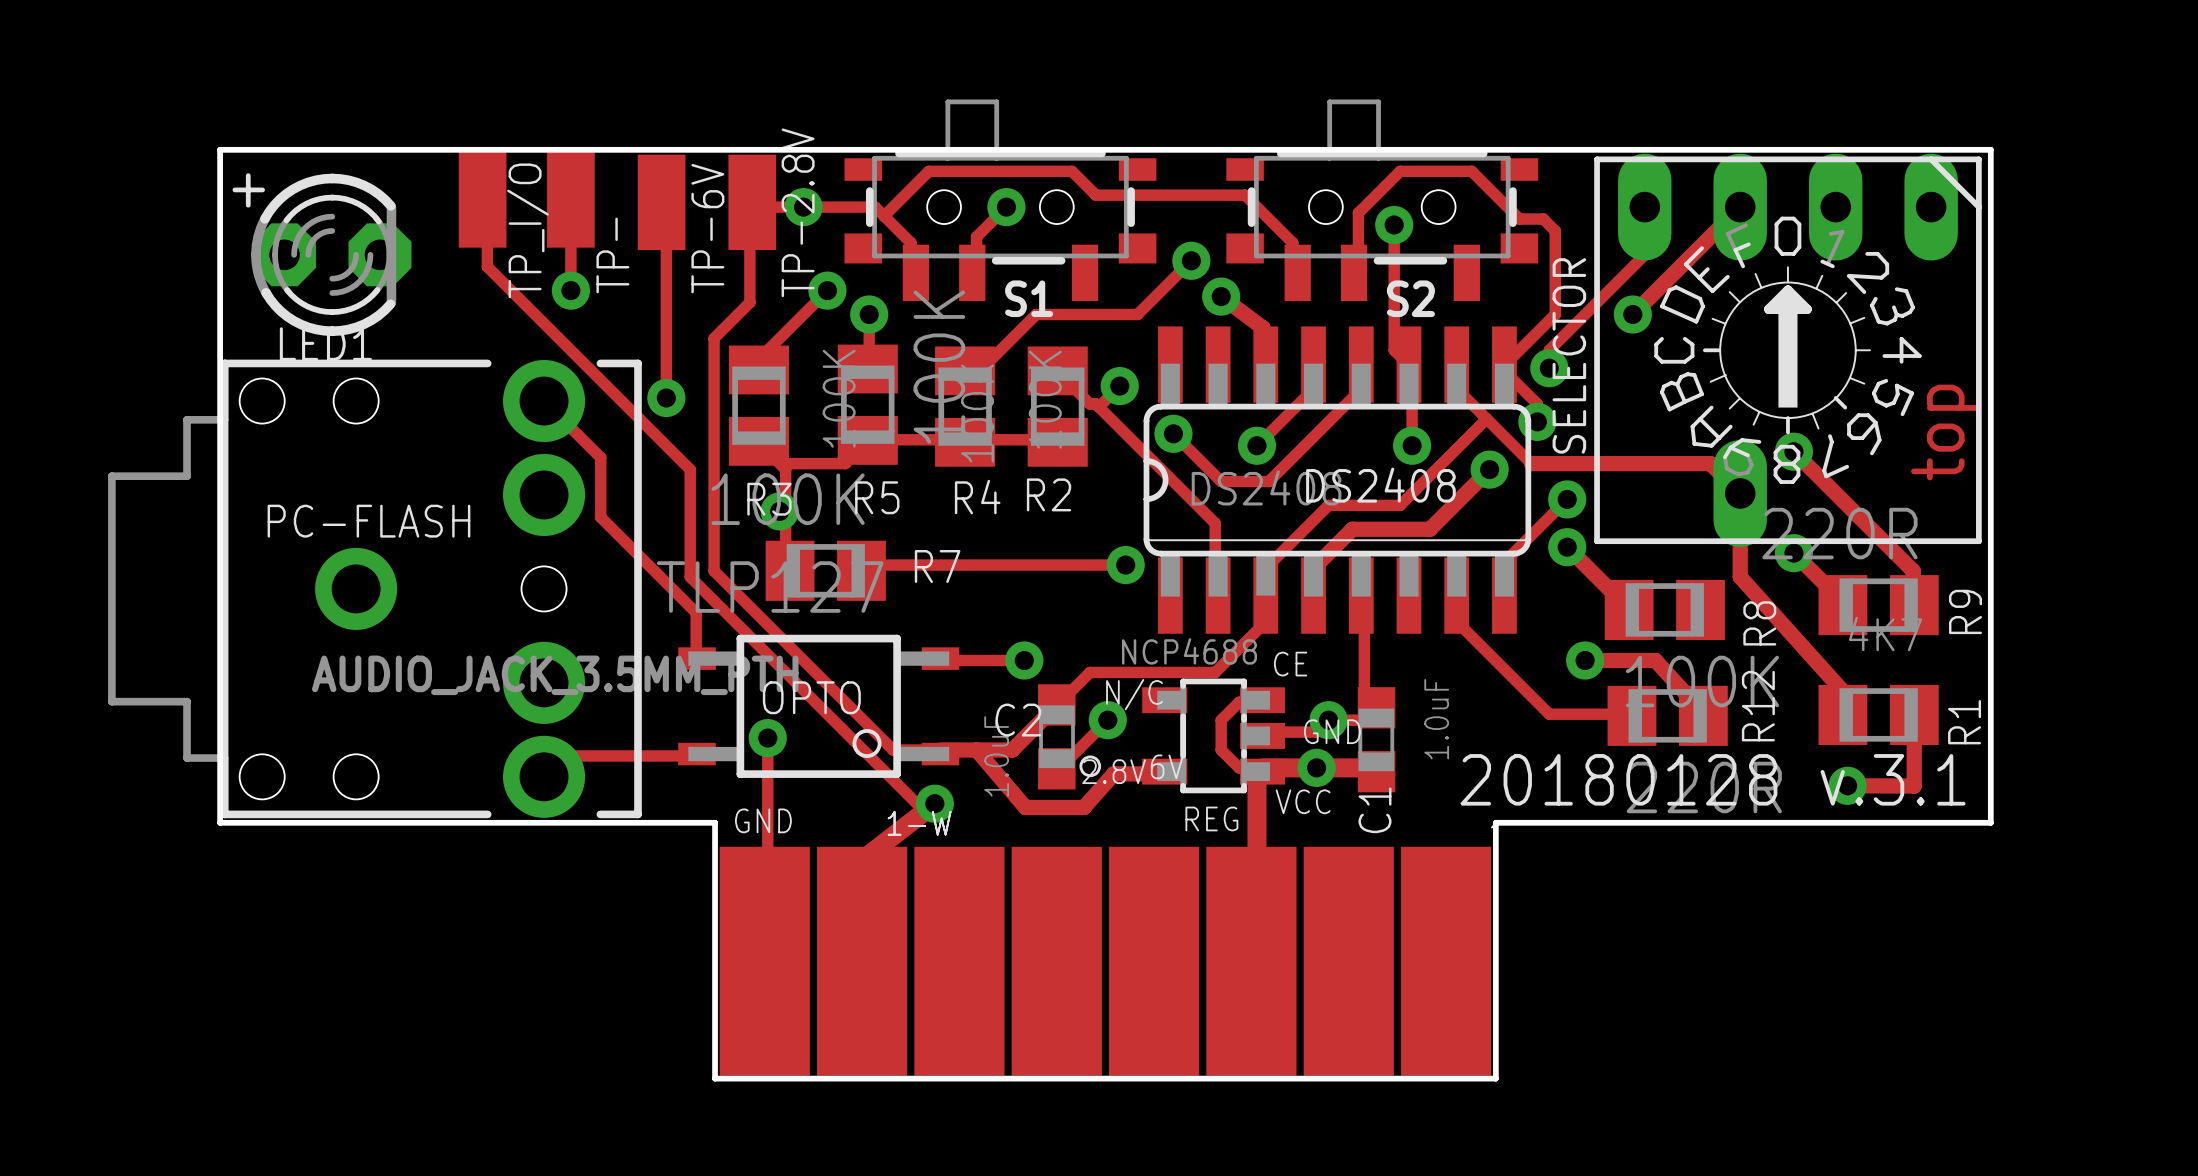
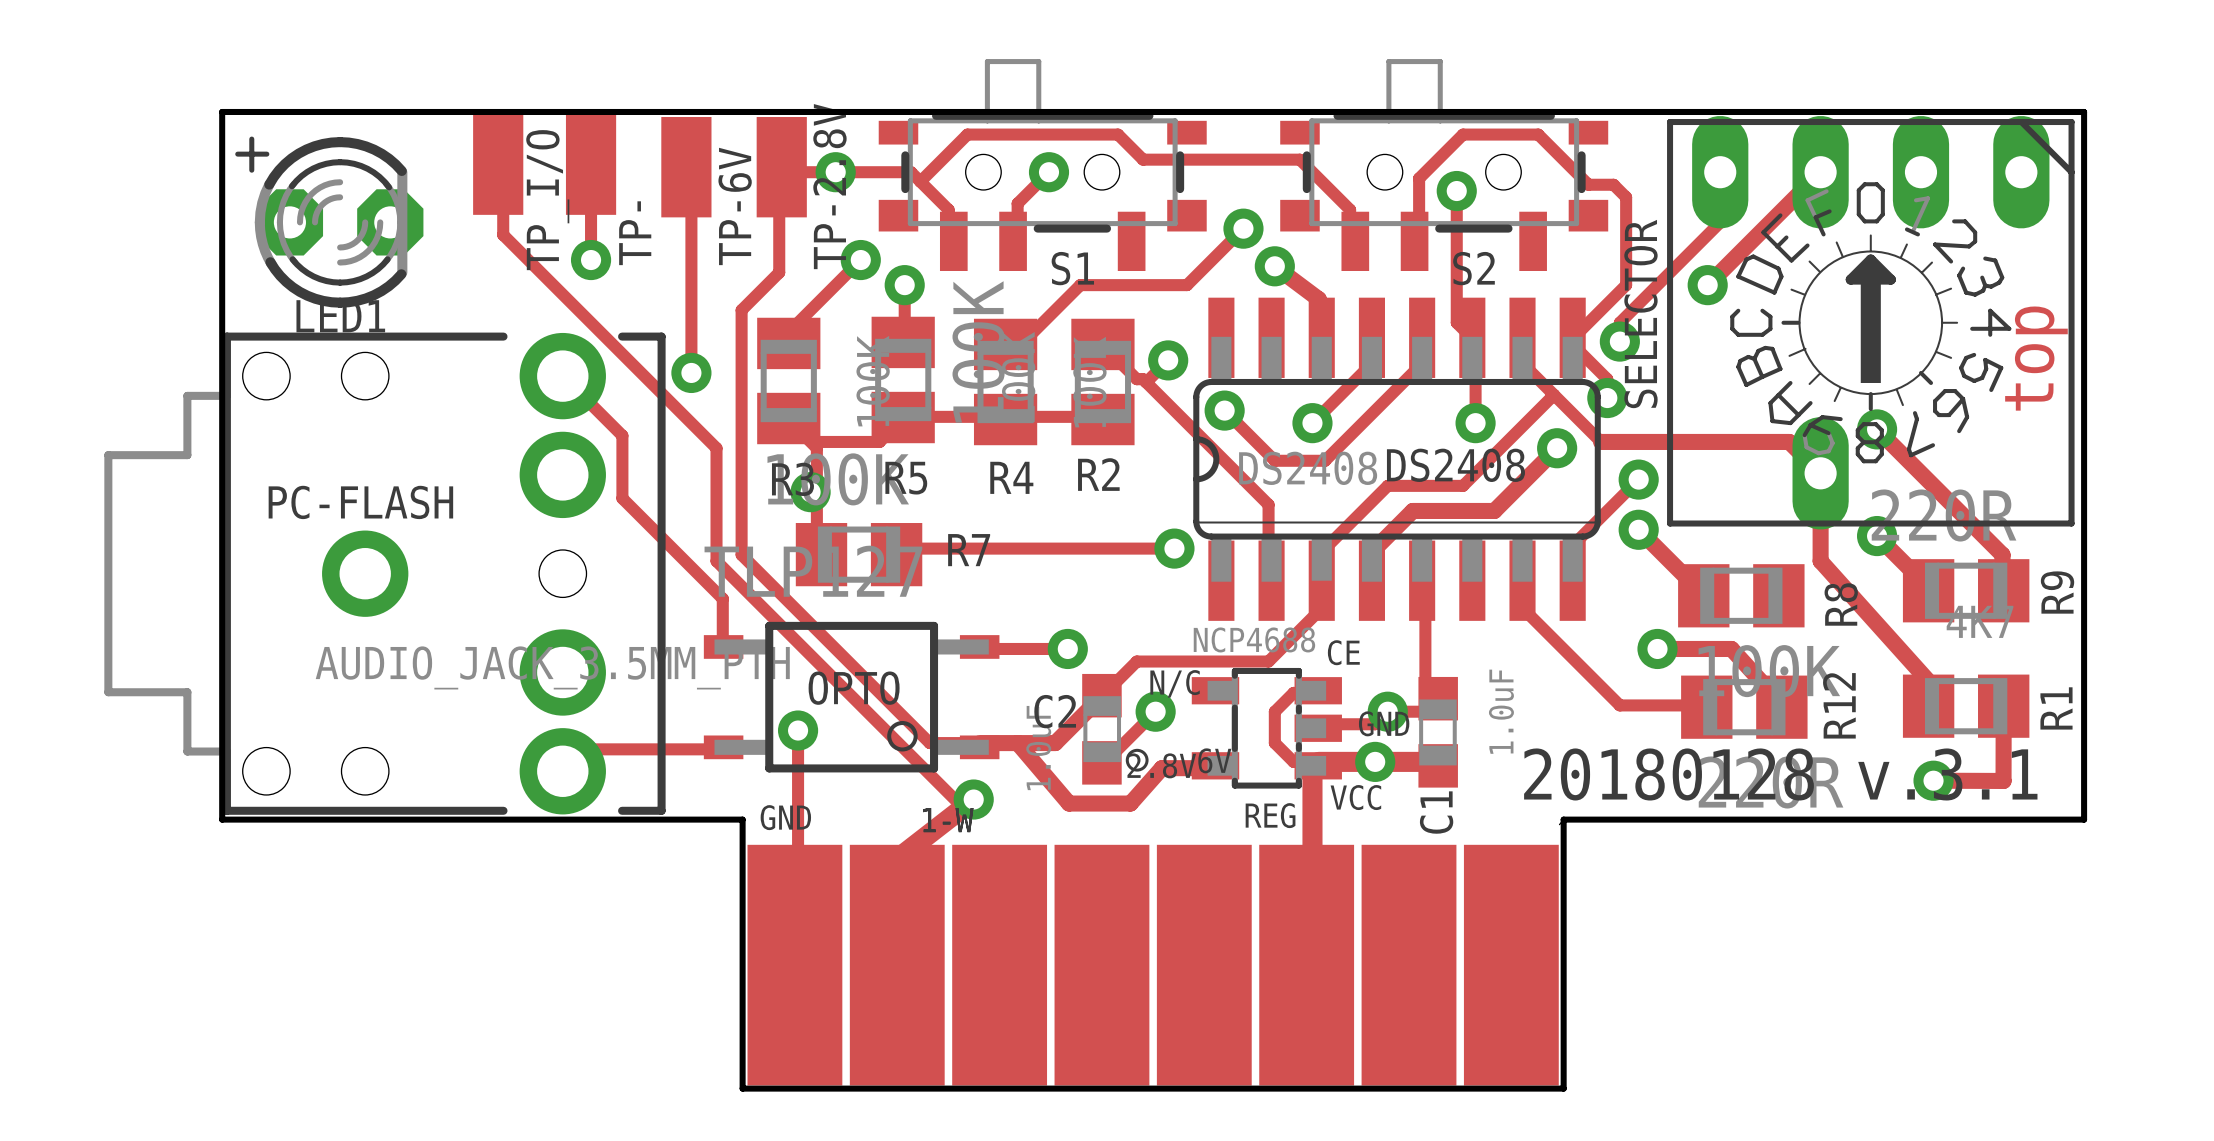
text position: top (1945, 432) -> top (2036, 358)

